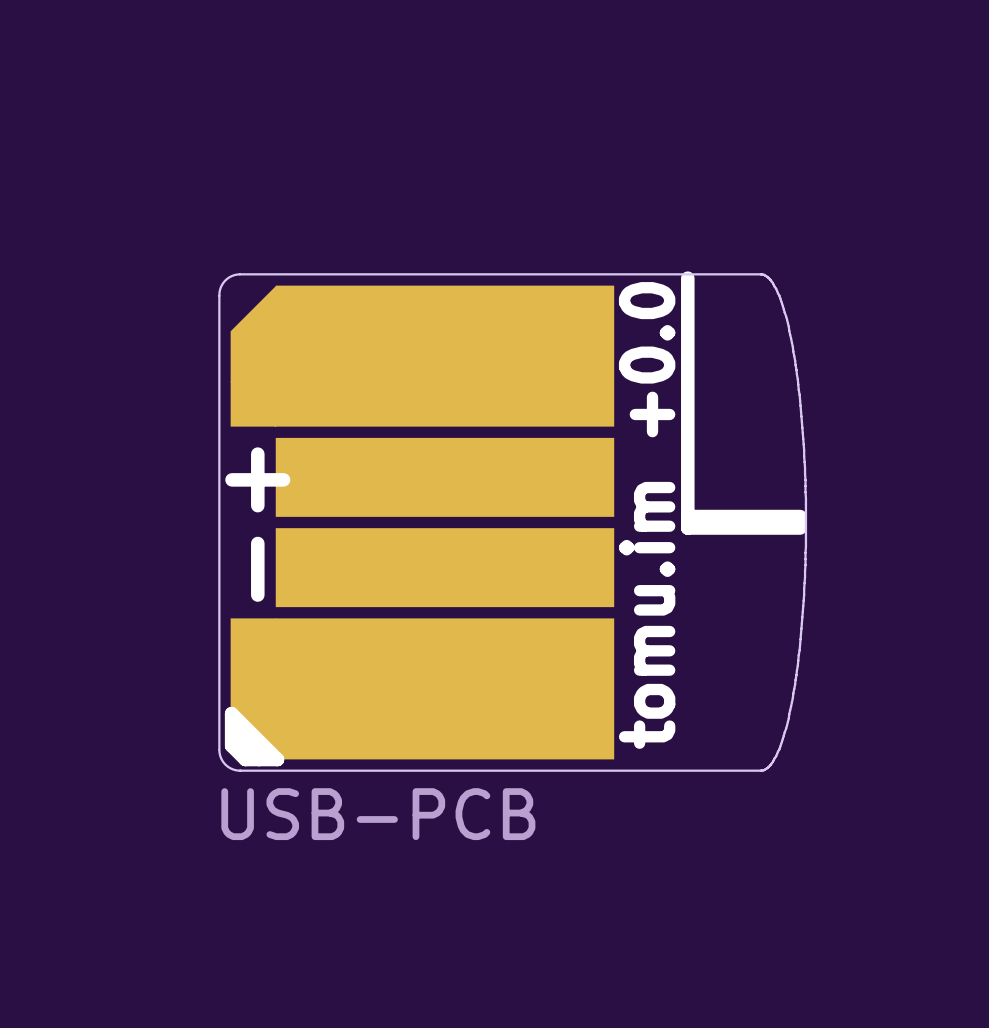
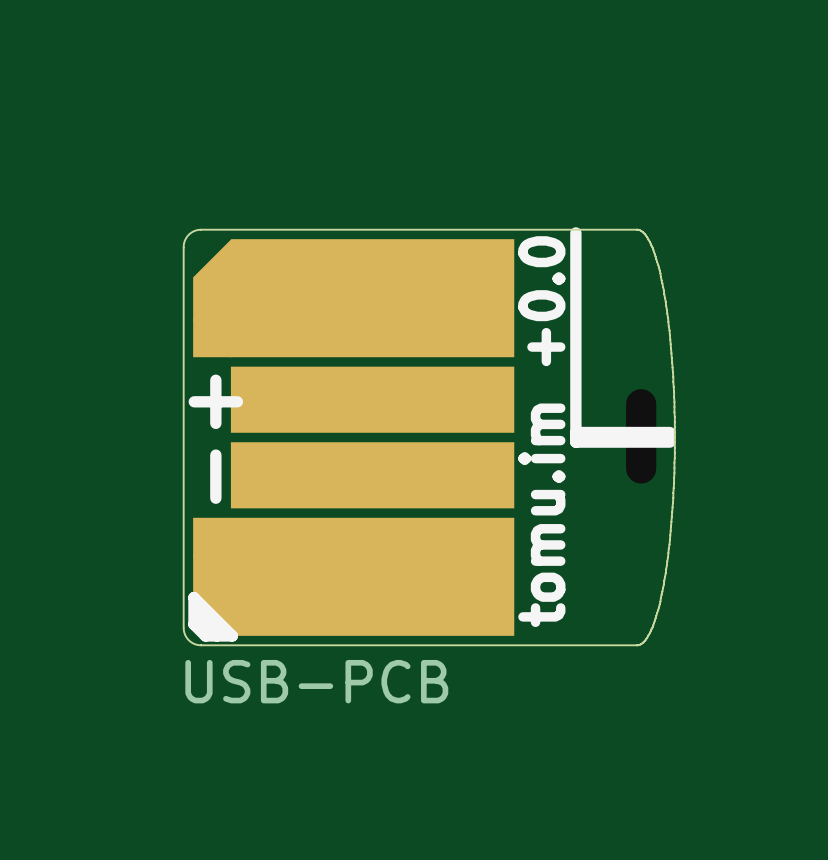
part: none -> (641, 436)

